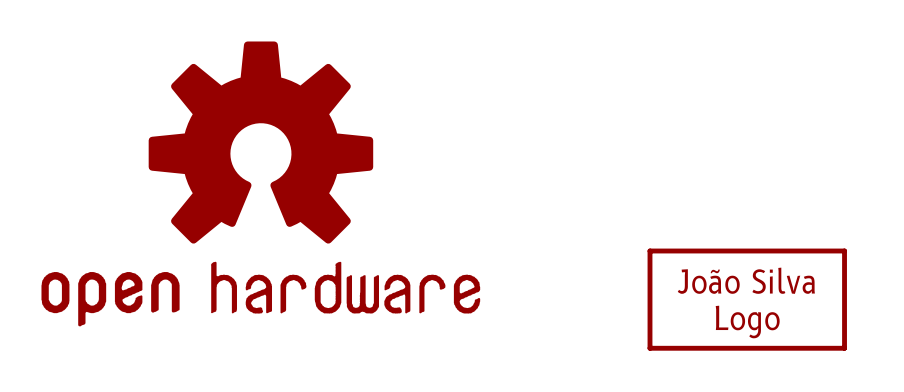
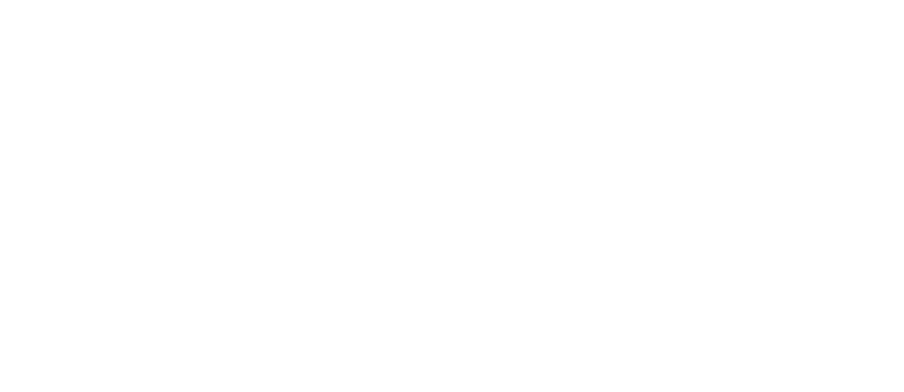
part: (260, 183) -> none
part: (747, 299) -> none

